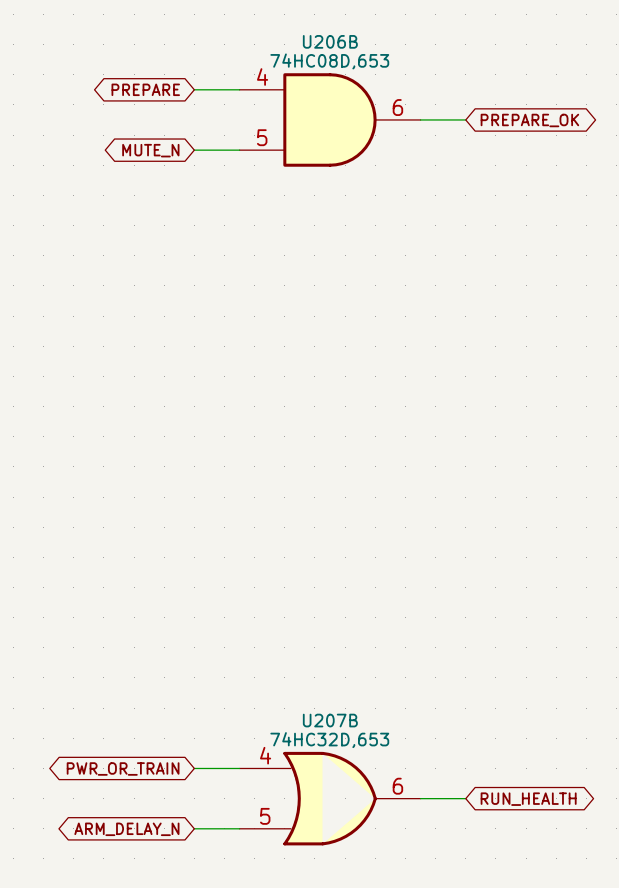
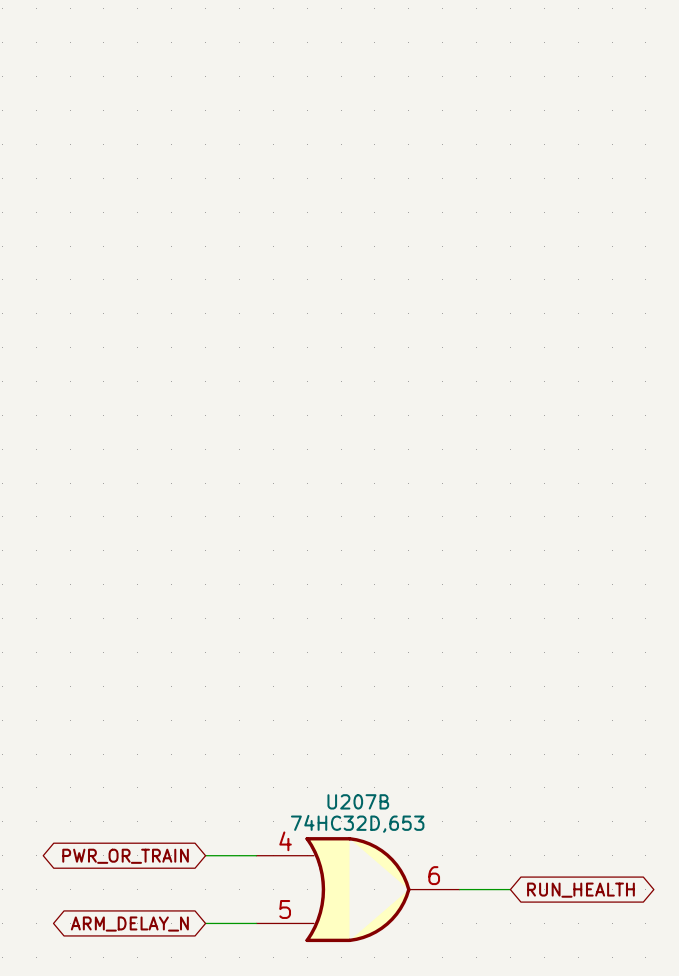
global label: PREPARE (145, 89) -> none
wire: (194, 89) (239, 89) -> none
U206B: 74HC08D,653 (330, 119) -> none
wire: (420, 119) (465, 119) -> none
global label: PREPARE_OK (529, 120) -> none
global label: MUTE_N (150, 150) -> none
wire: (194, 150) (239, 150) -> none

